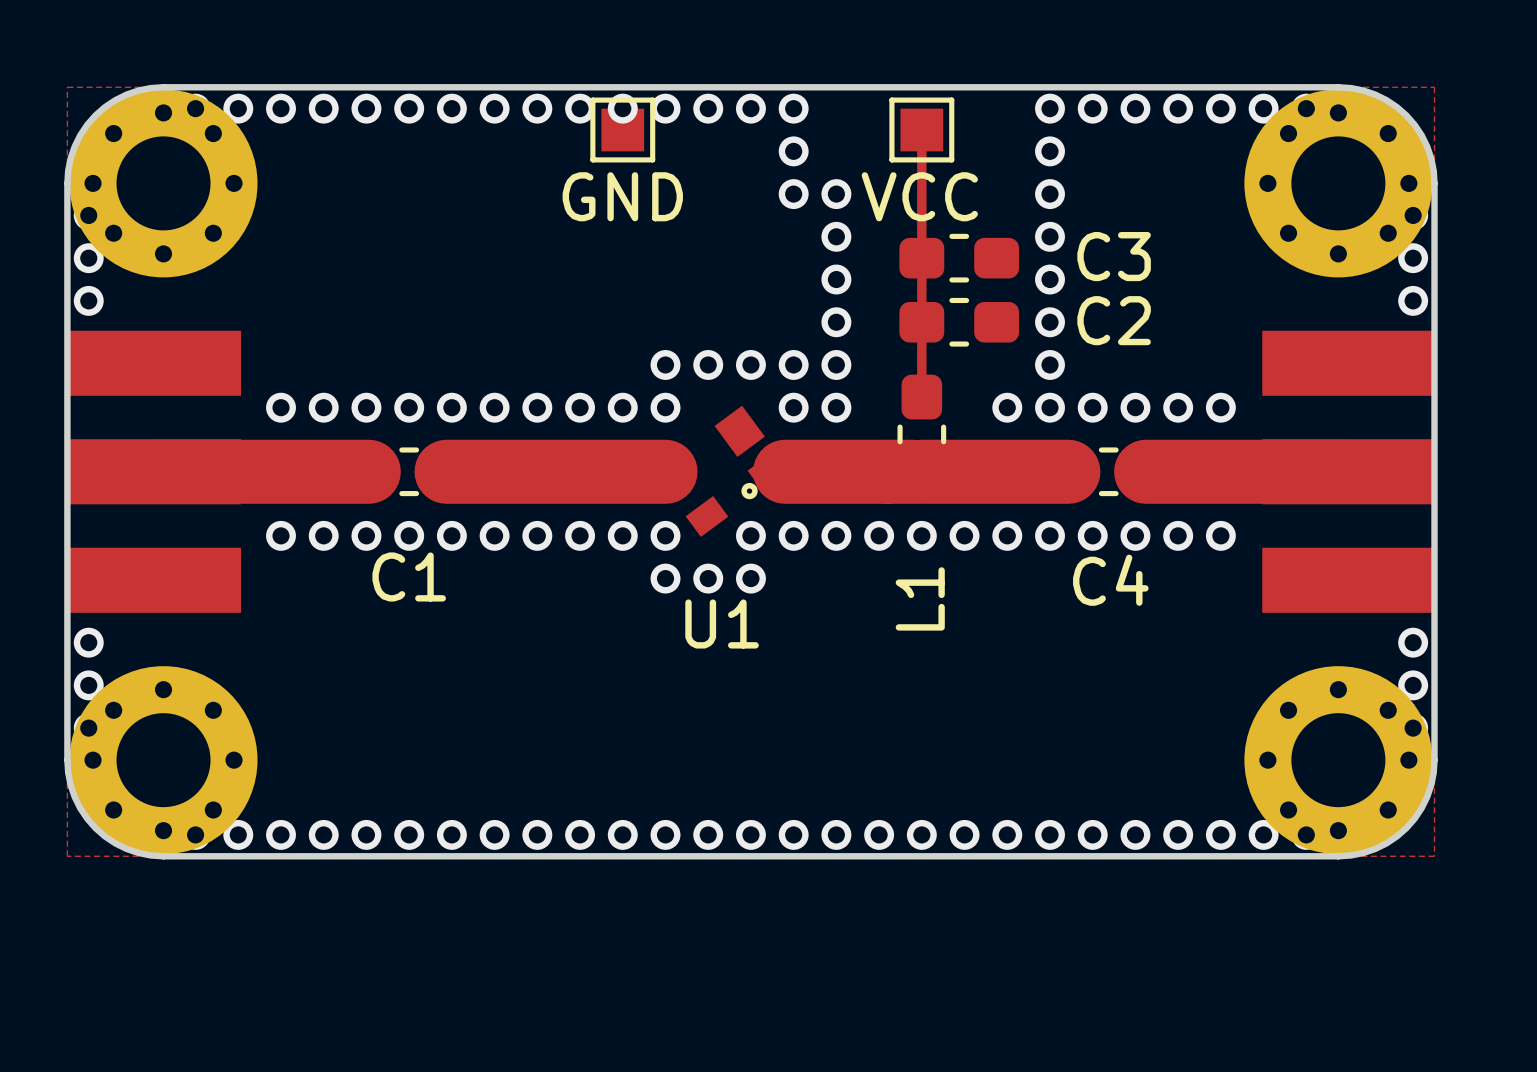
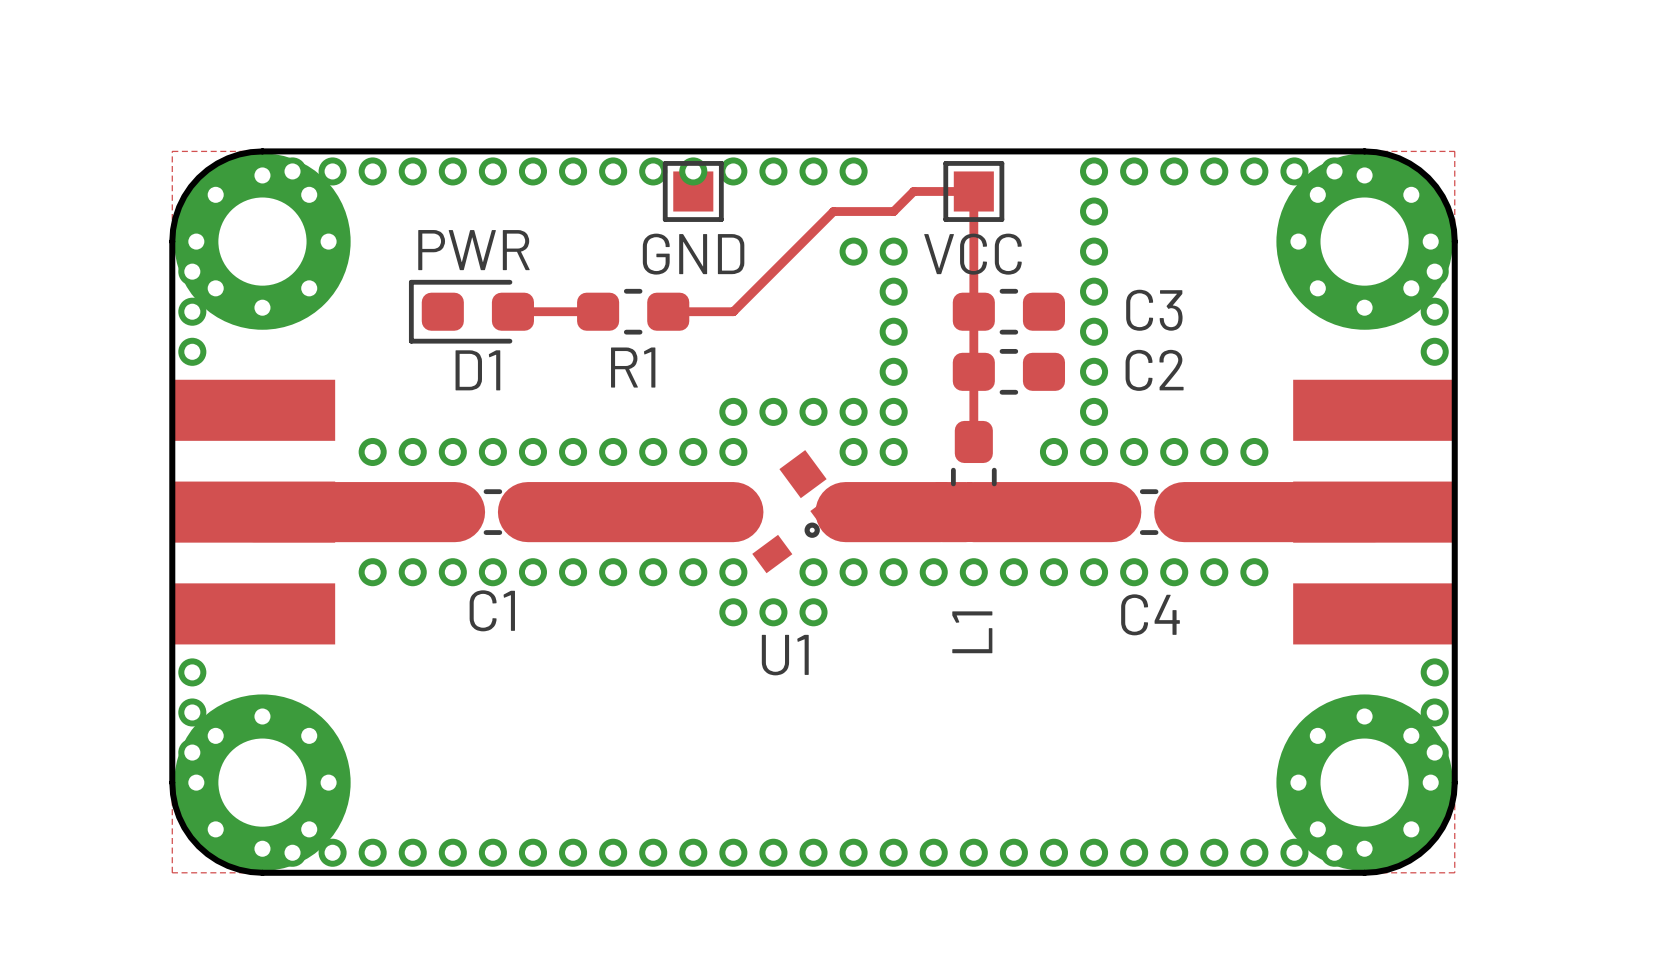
track: none -> (973, 191) (913, 191) (893, 211) (833, 211) (733, 311) (668, 311)
via: (793, 151) -> none
text: none -> PWR (473, 250)
D1: none -> (471, 311)
track: none -> (512, 311) (598, 311)
R1: none -> (633, 311)

